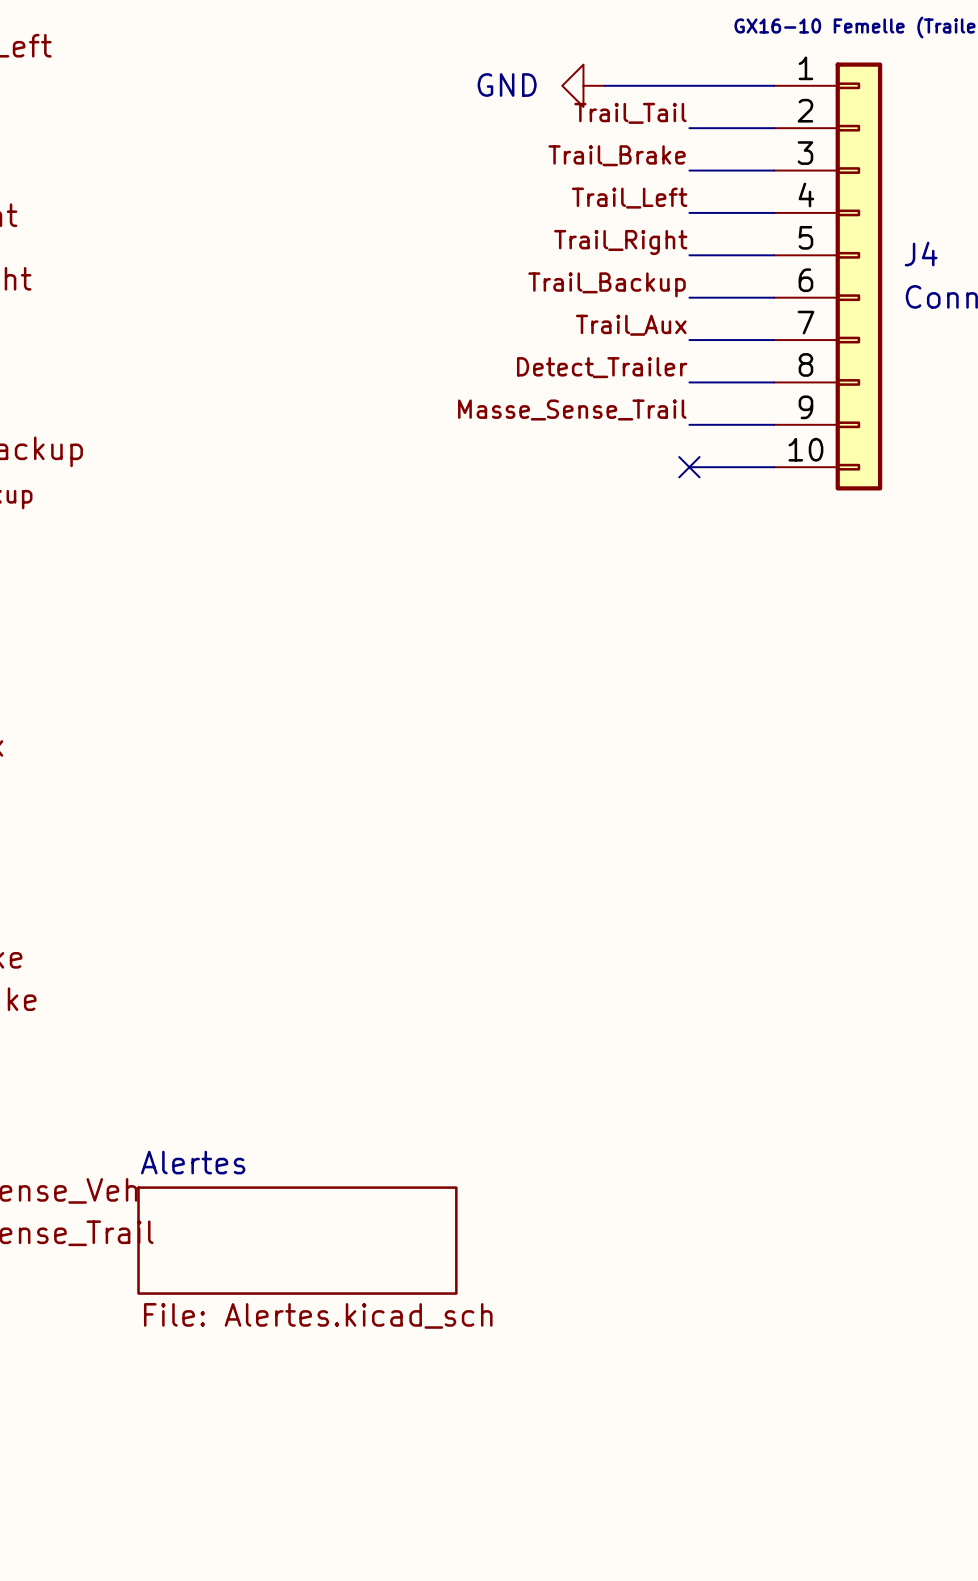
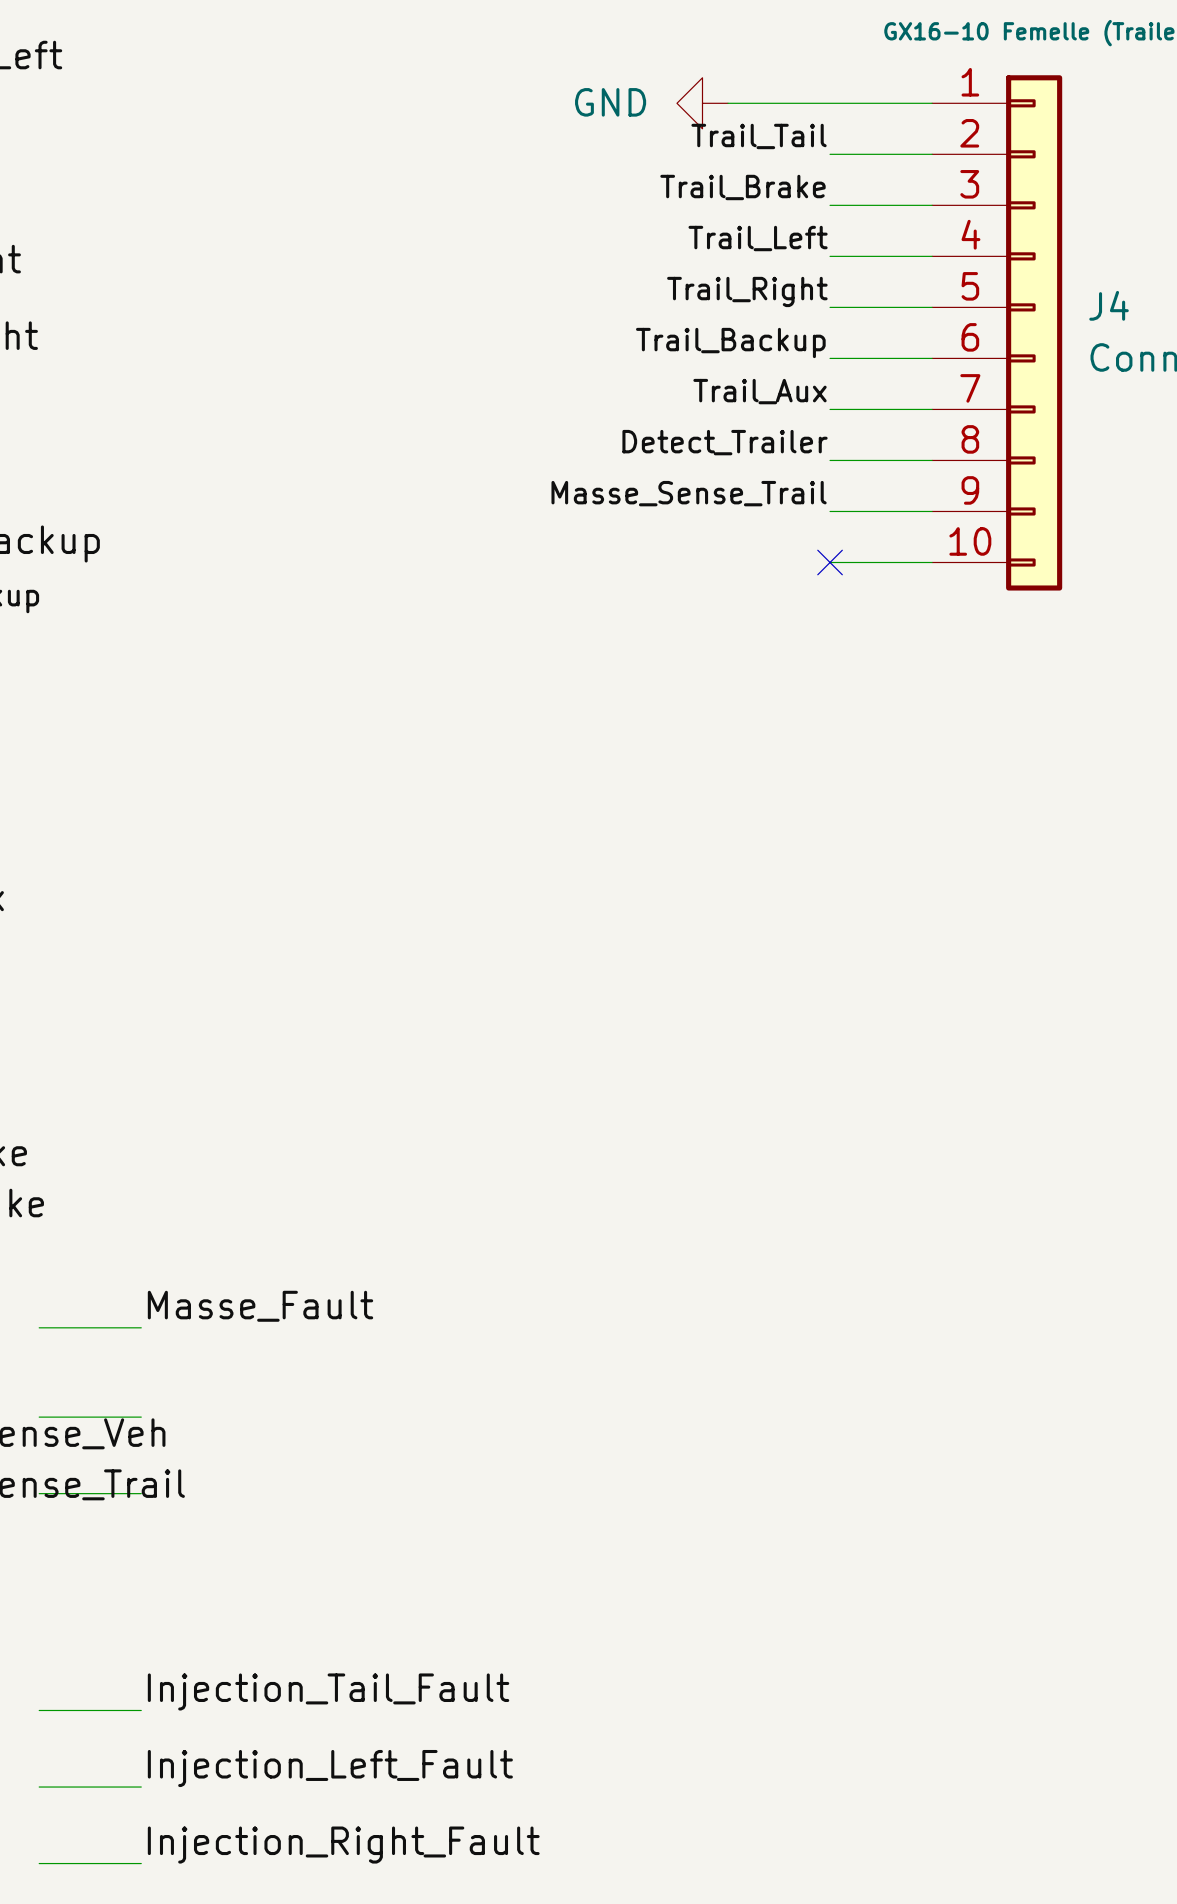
label: none -> Masse_Fault (260, 1306)
wire: none -> (39, 1327) (141, 1327)
wire: none -> (39, 1417) (141, 1417)
wire: none -> (39, 1493) (141, 1493)
sheet Alertes: File: Alertes.kicad_sch (297, 1240) -> none
label: none -> Injection_Tail_Fault (328, 1691)
wire: none -> (39, 1710) (141, 1710)
label: none -> Injection_Left_Fault (330, 1768)
wire: none -> (39, 1787) (141, 1787)
label: none -> Injection_Right_Fault (343, 1845)
wire: none -> (39, 1863) (141, 1863)

